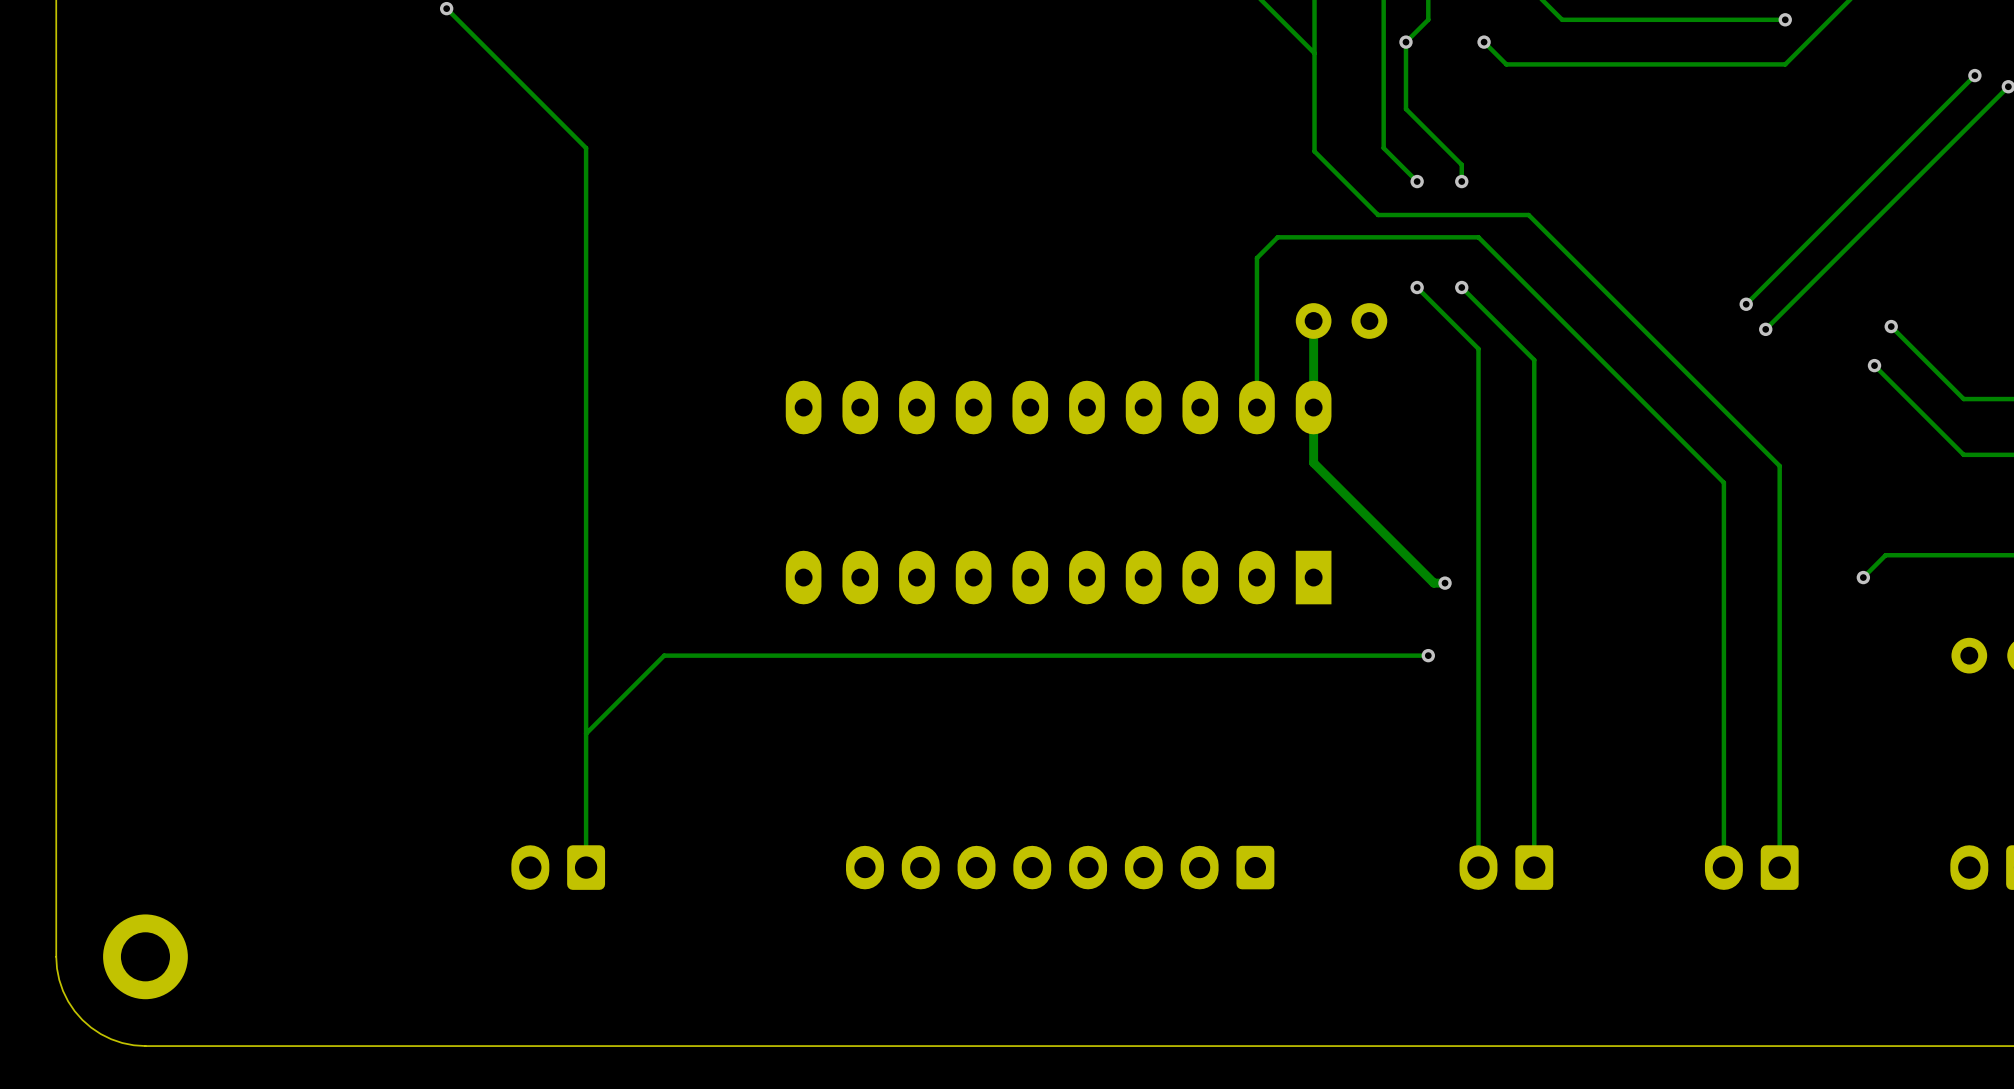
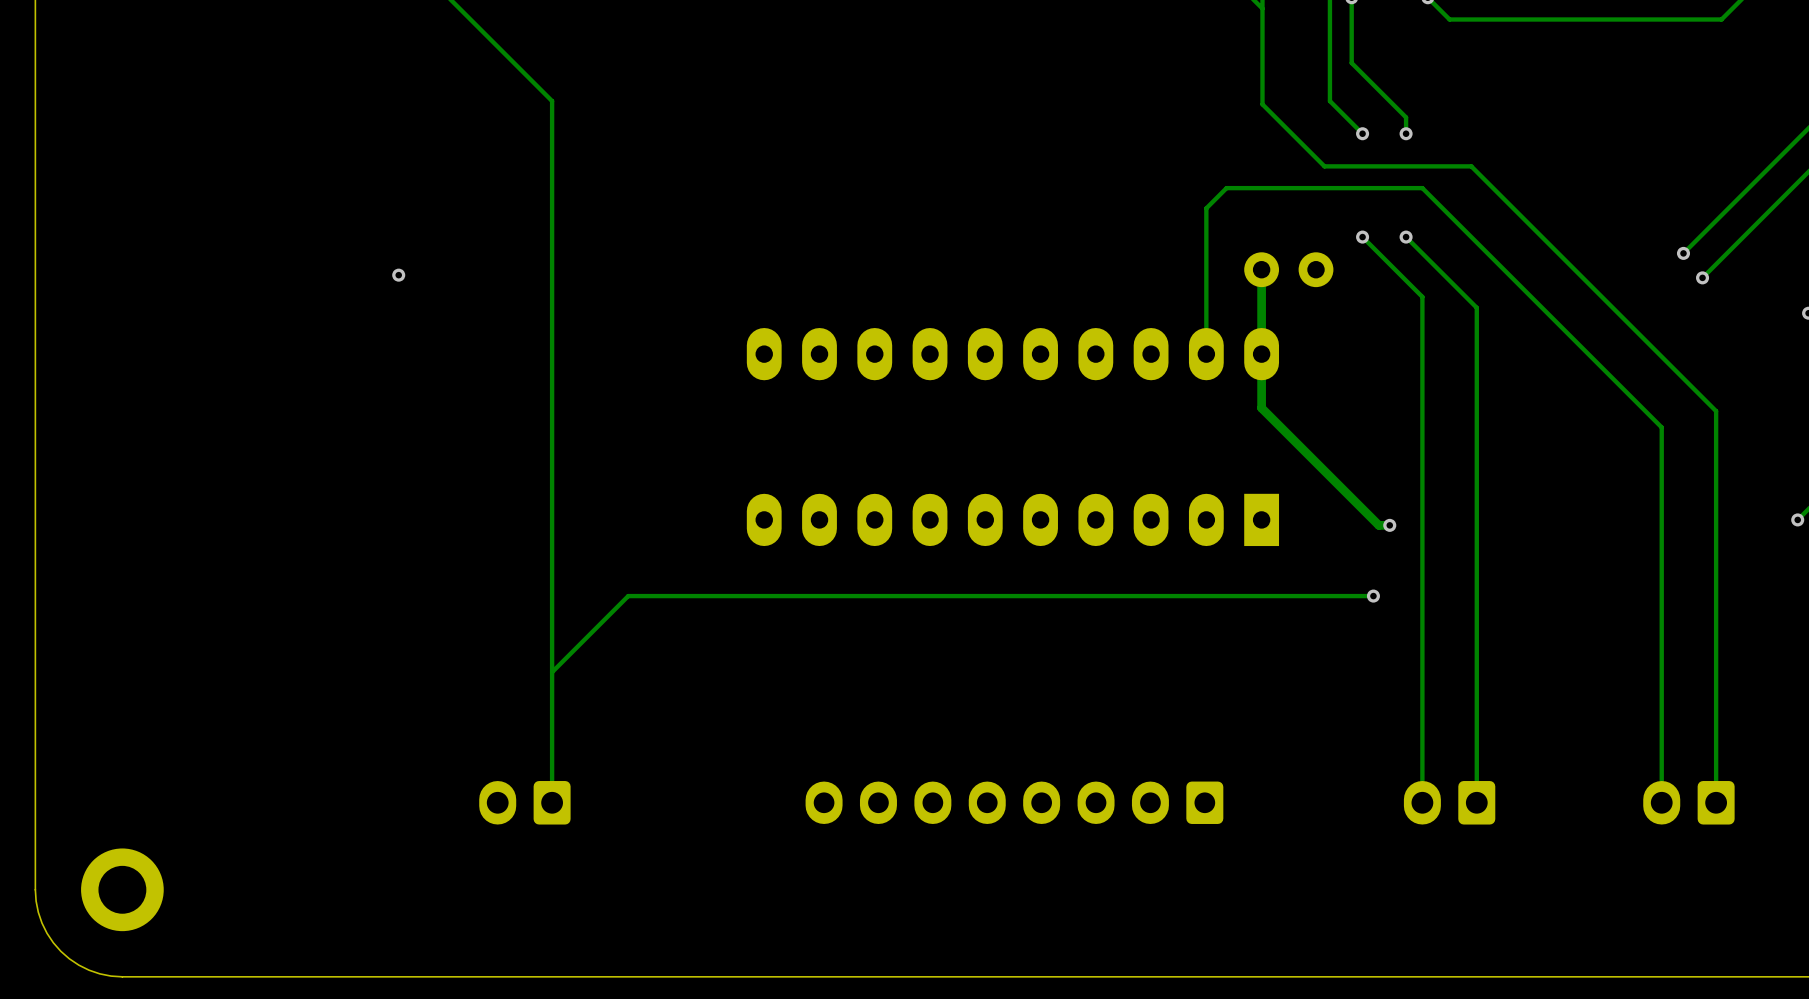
via: none -> (398, 275)

